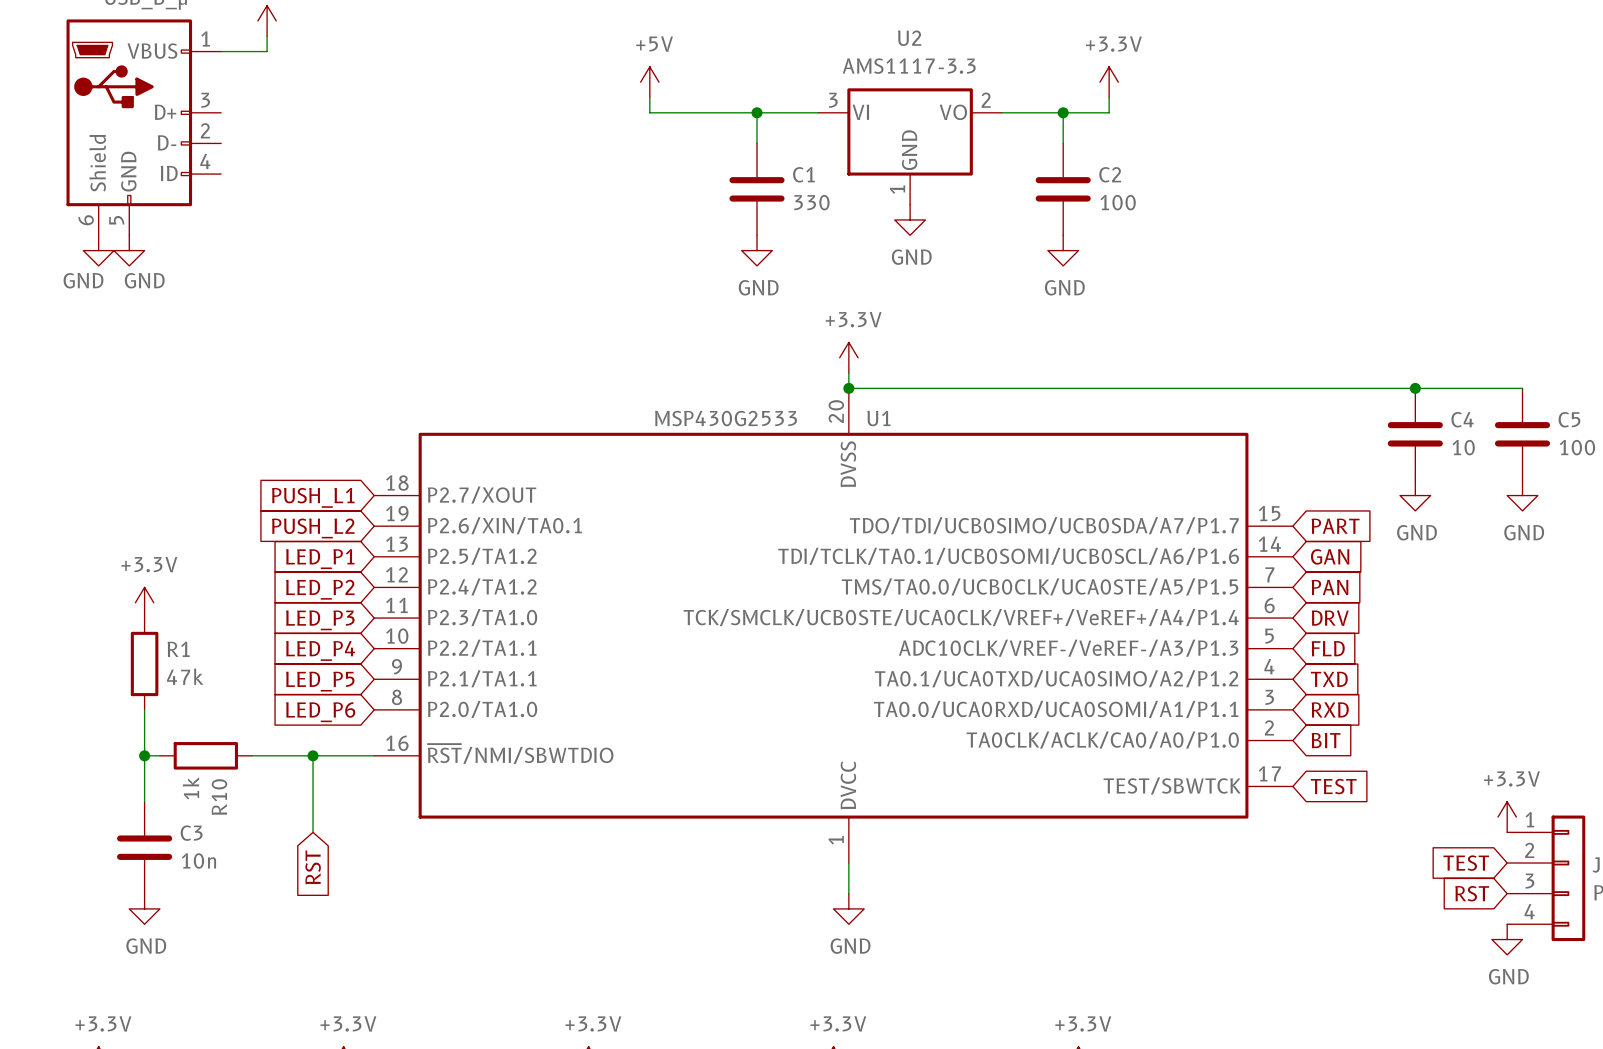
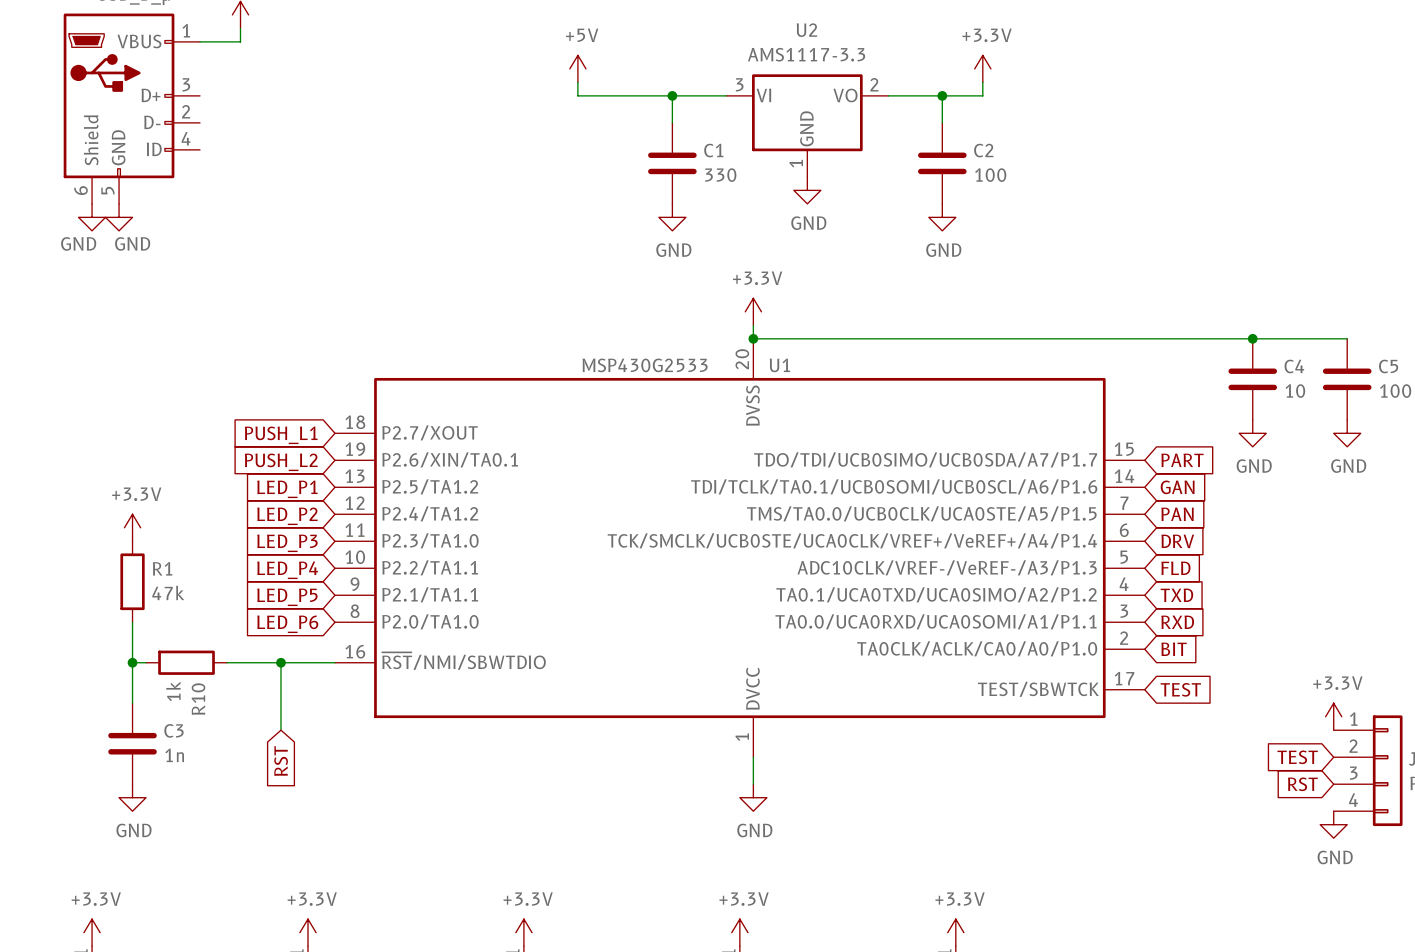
C3 value: 10n (198, 860) -> 1n (174, 755)

